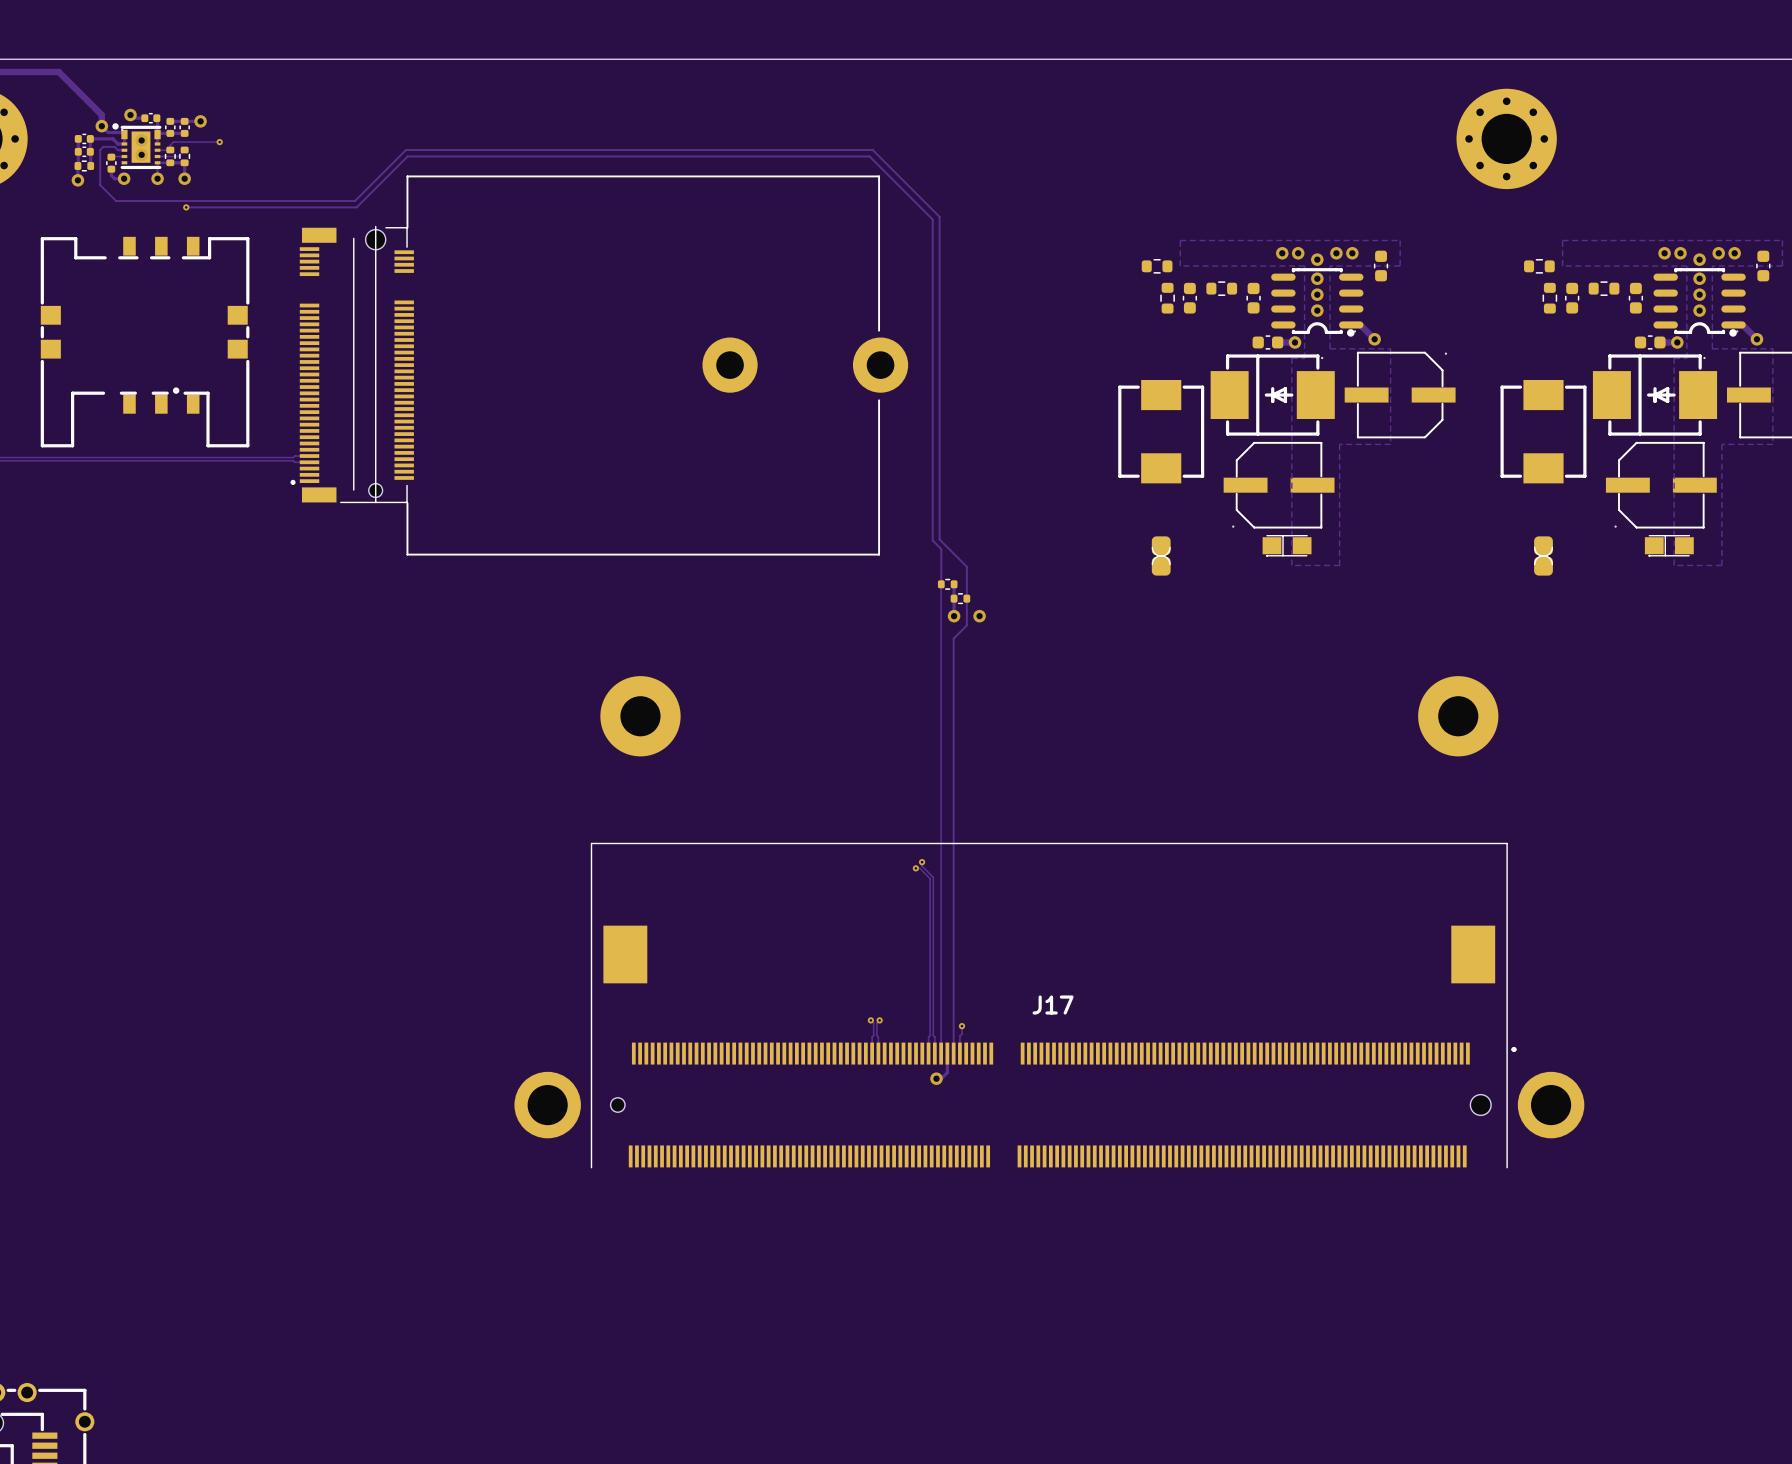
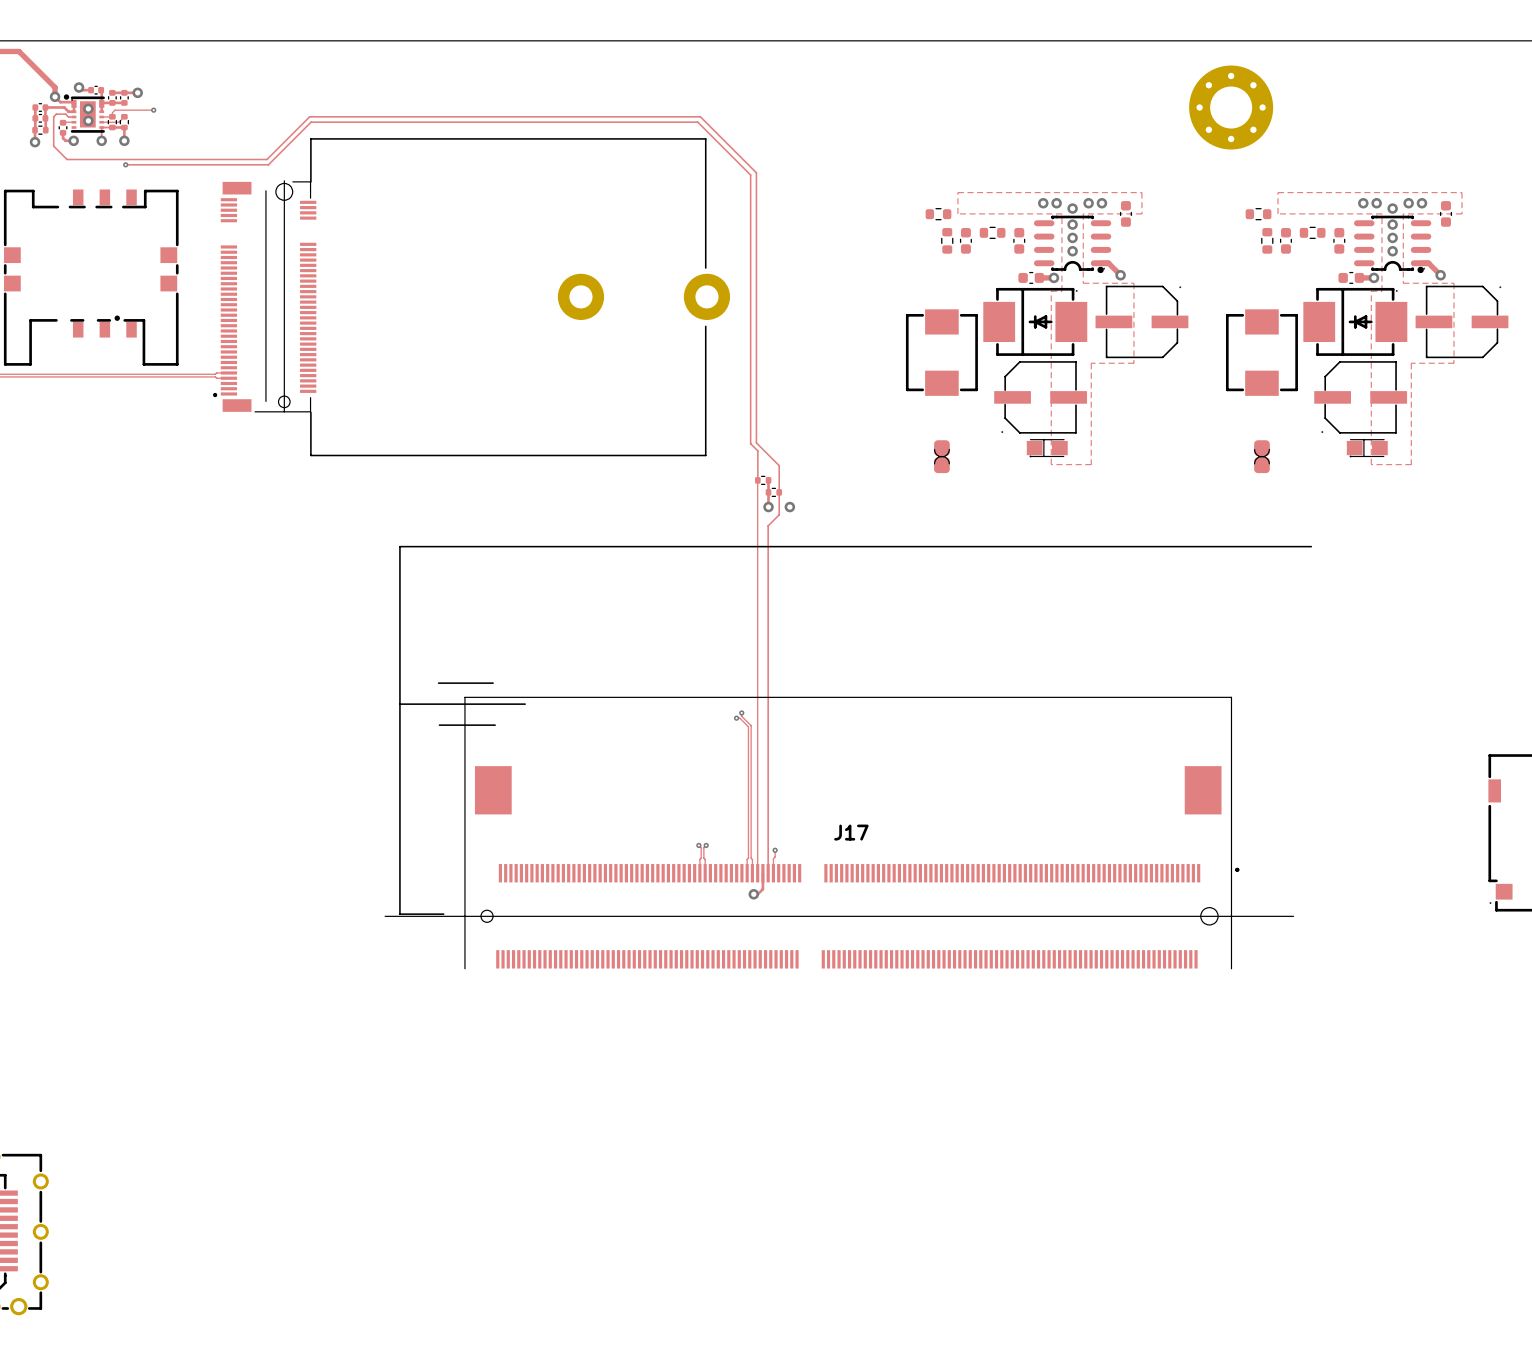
line: none -> (1311, 546) (399, 546) (399, 914) (443, 914)
part: (640, 716) -> none
part: (1458, 716) -> none
line: none -> (438, 683) (493, 683)
line: none -> (400, 704) (525, 704)
line: none -> (439, 725) (495, 725)
line: none -> (385, 916) (1293, 916)
part: (547, 1105) -> none
part: (1551, 1105) -> none

